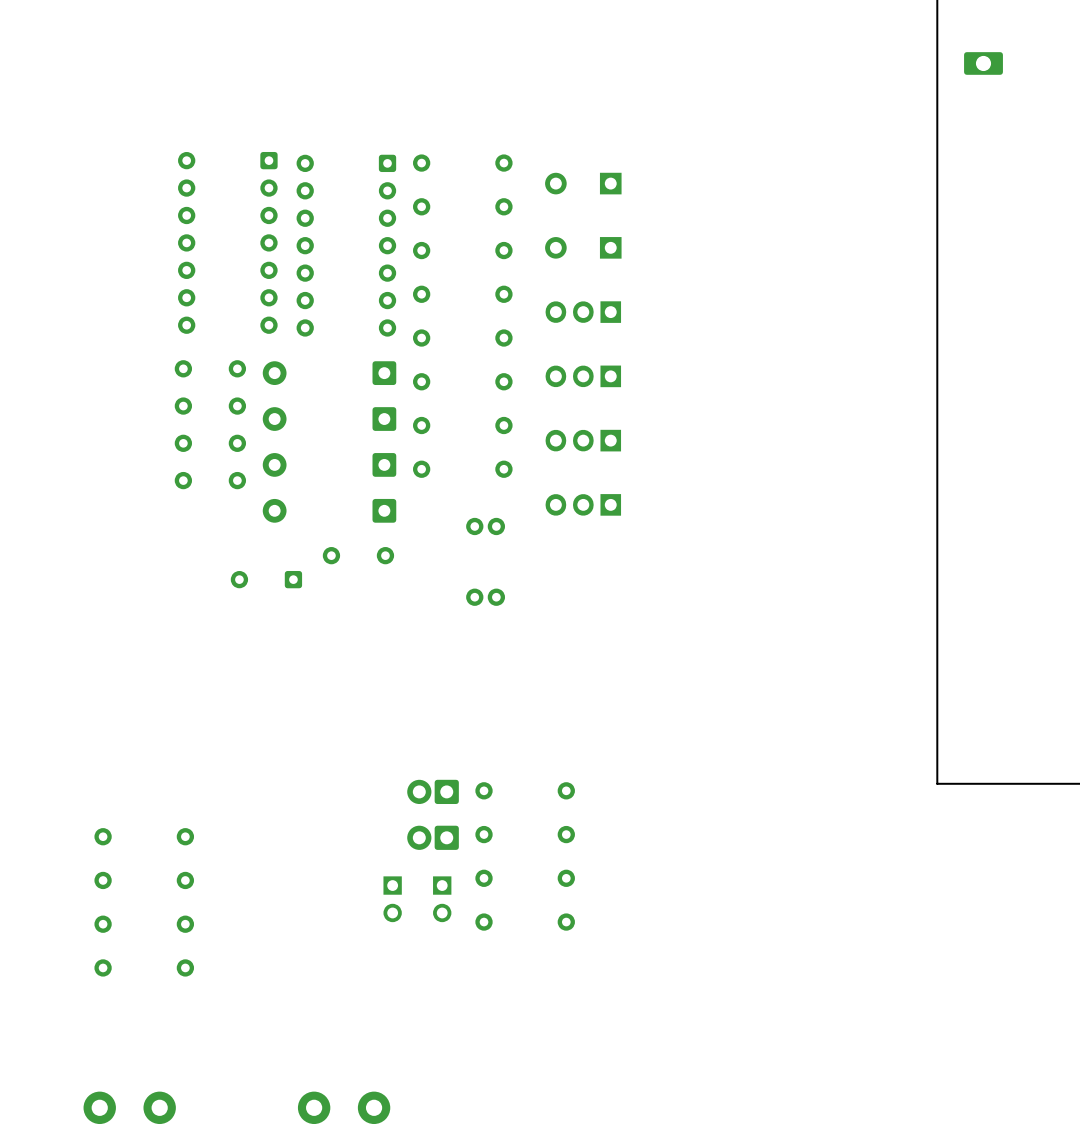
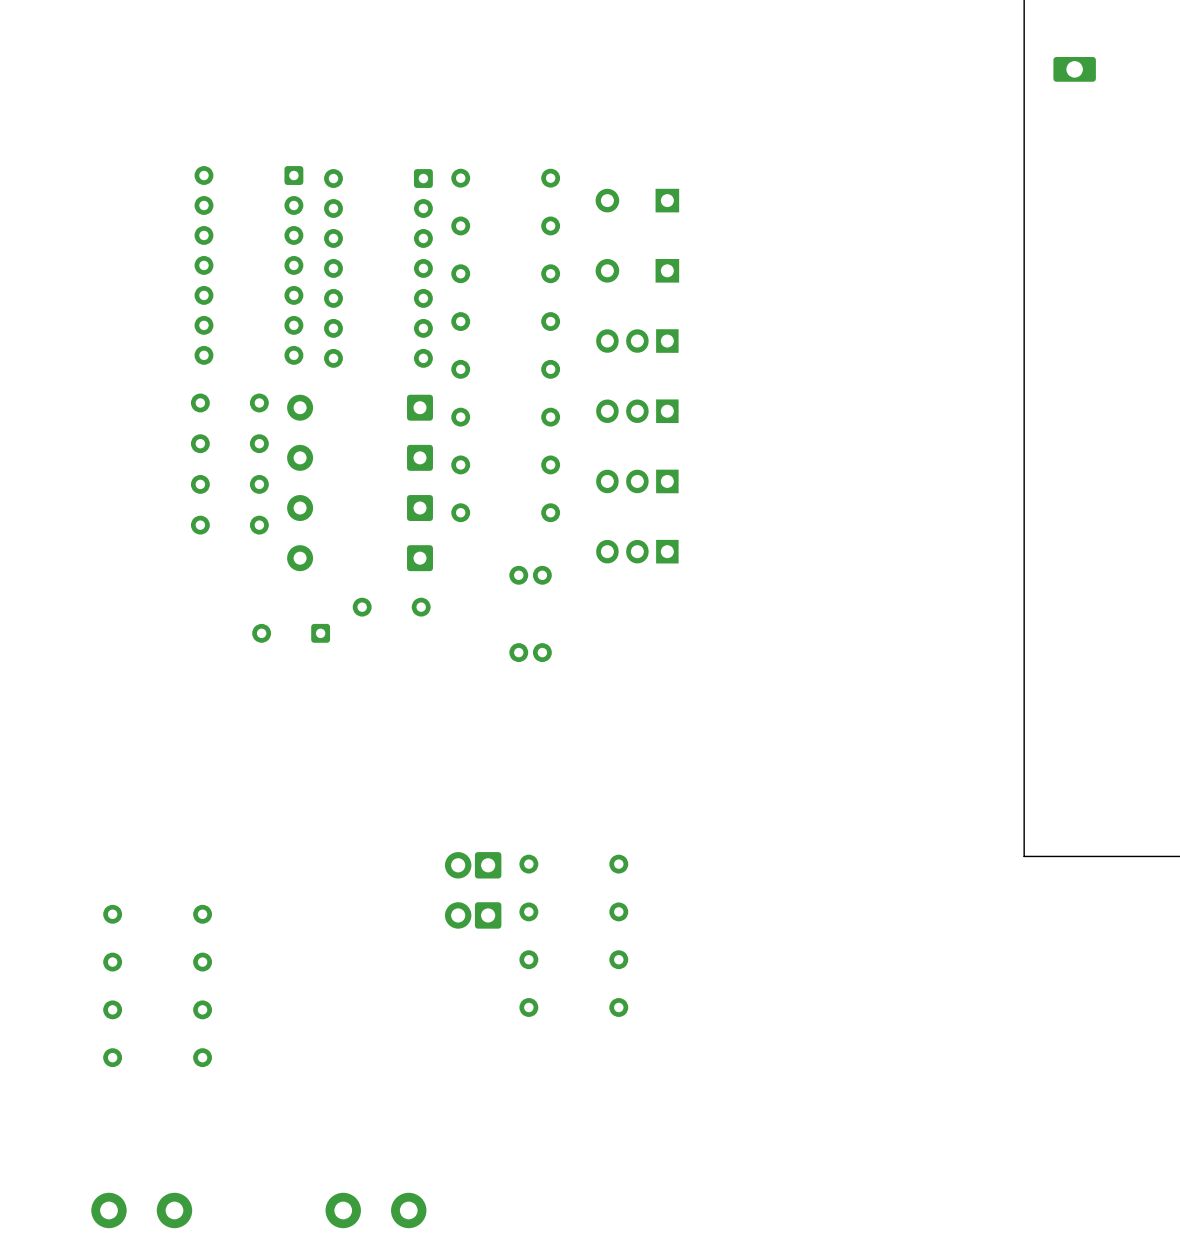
part: (392, 899) -> none
part: (442, 899) -> none

